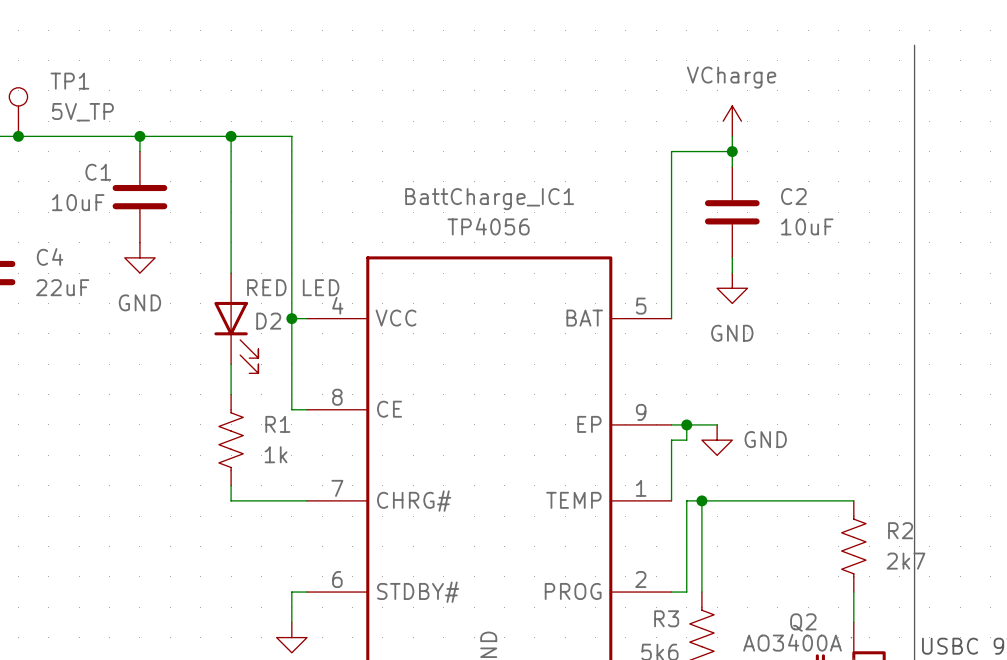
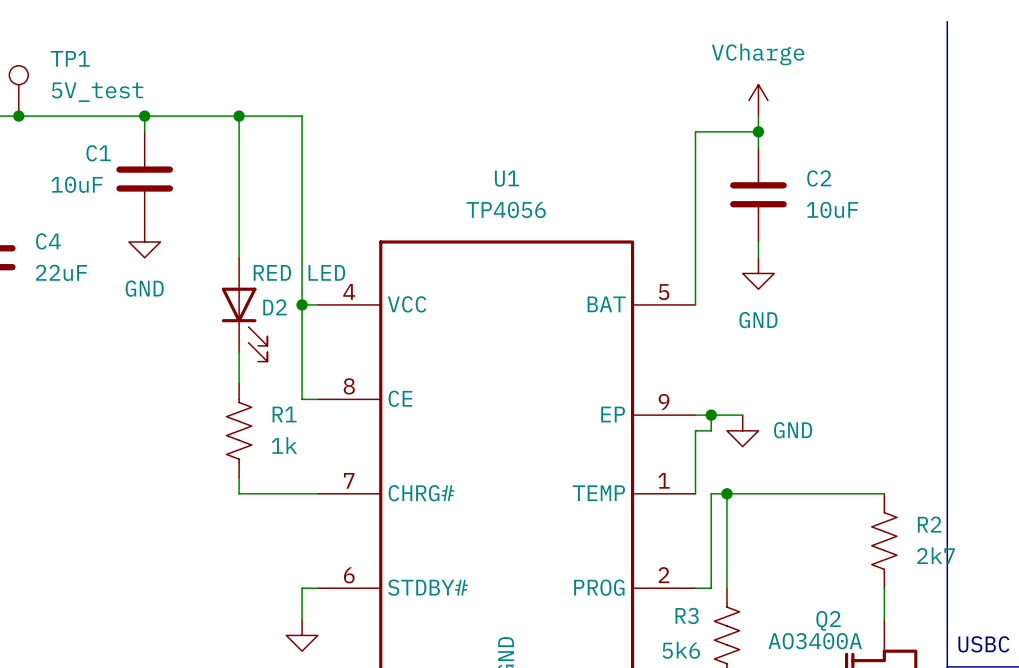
TP1 value: 5V_TP (82, 112) -> 5V_test (97, 92)
BattCharge_IC1 name: BattCharge_IC1 (489, 199) -> U1 (507, 178)

